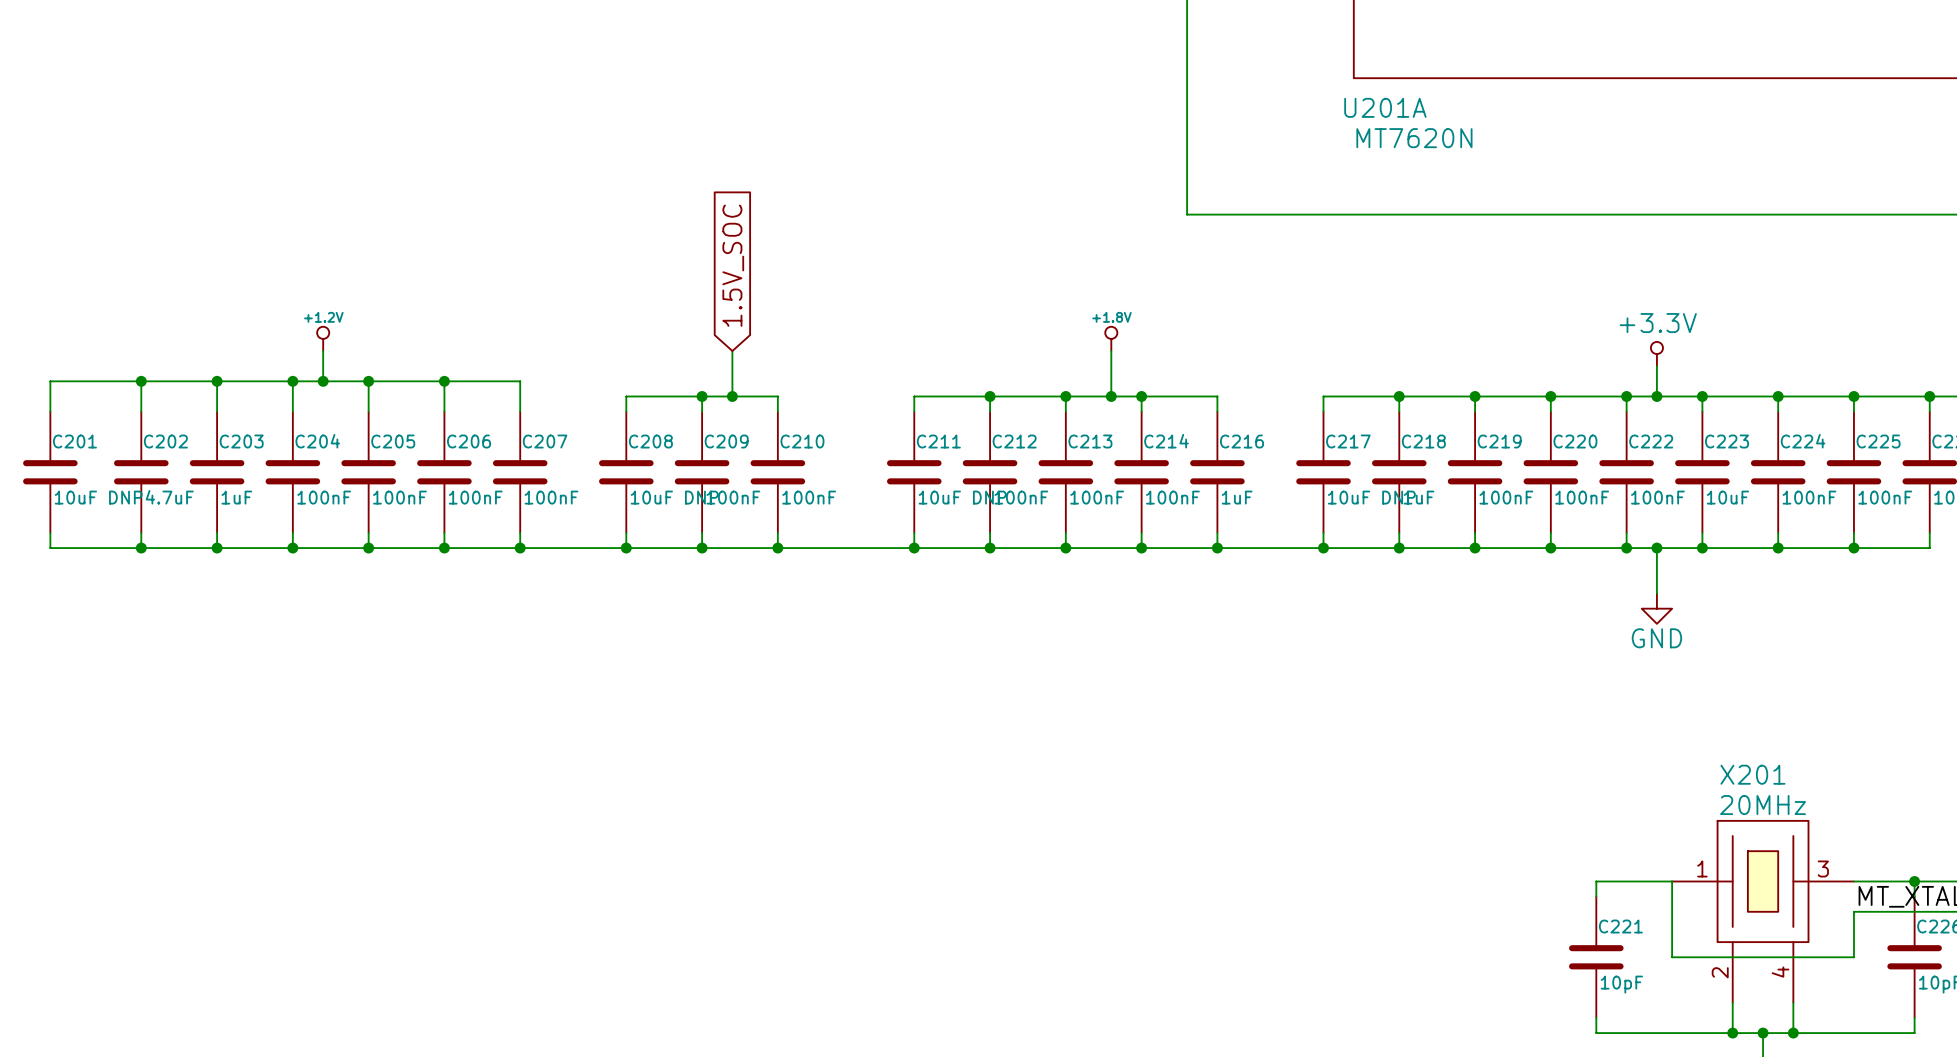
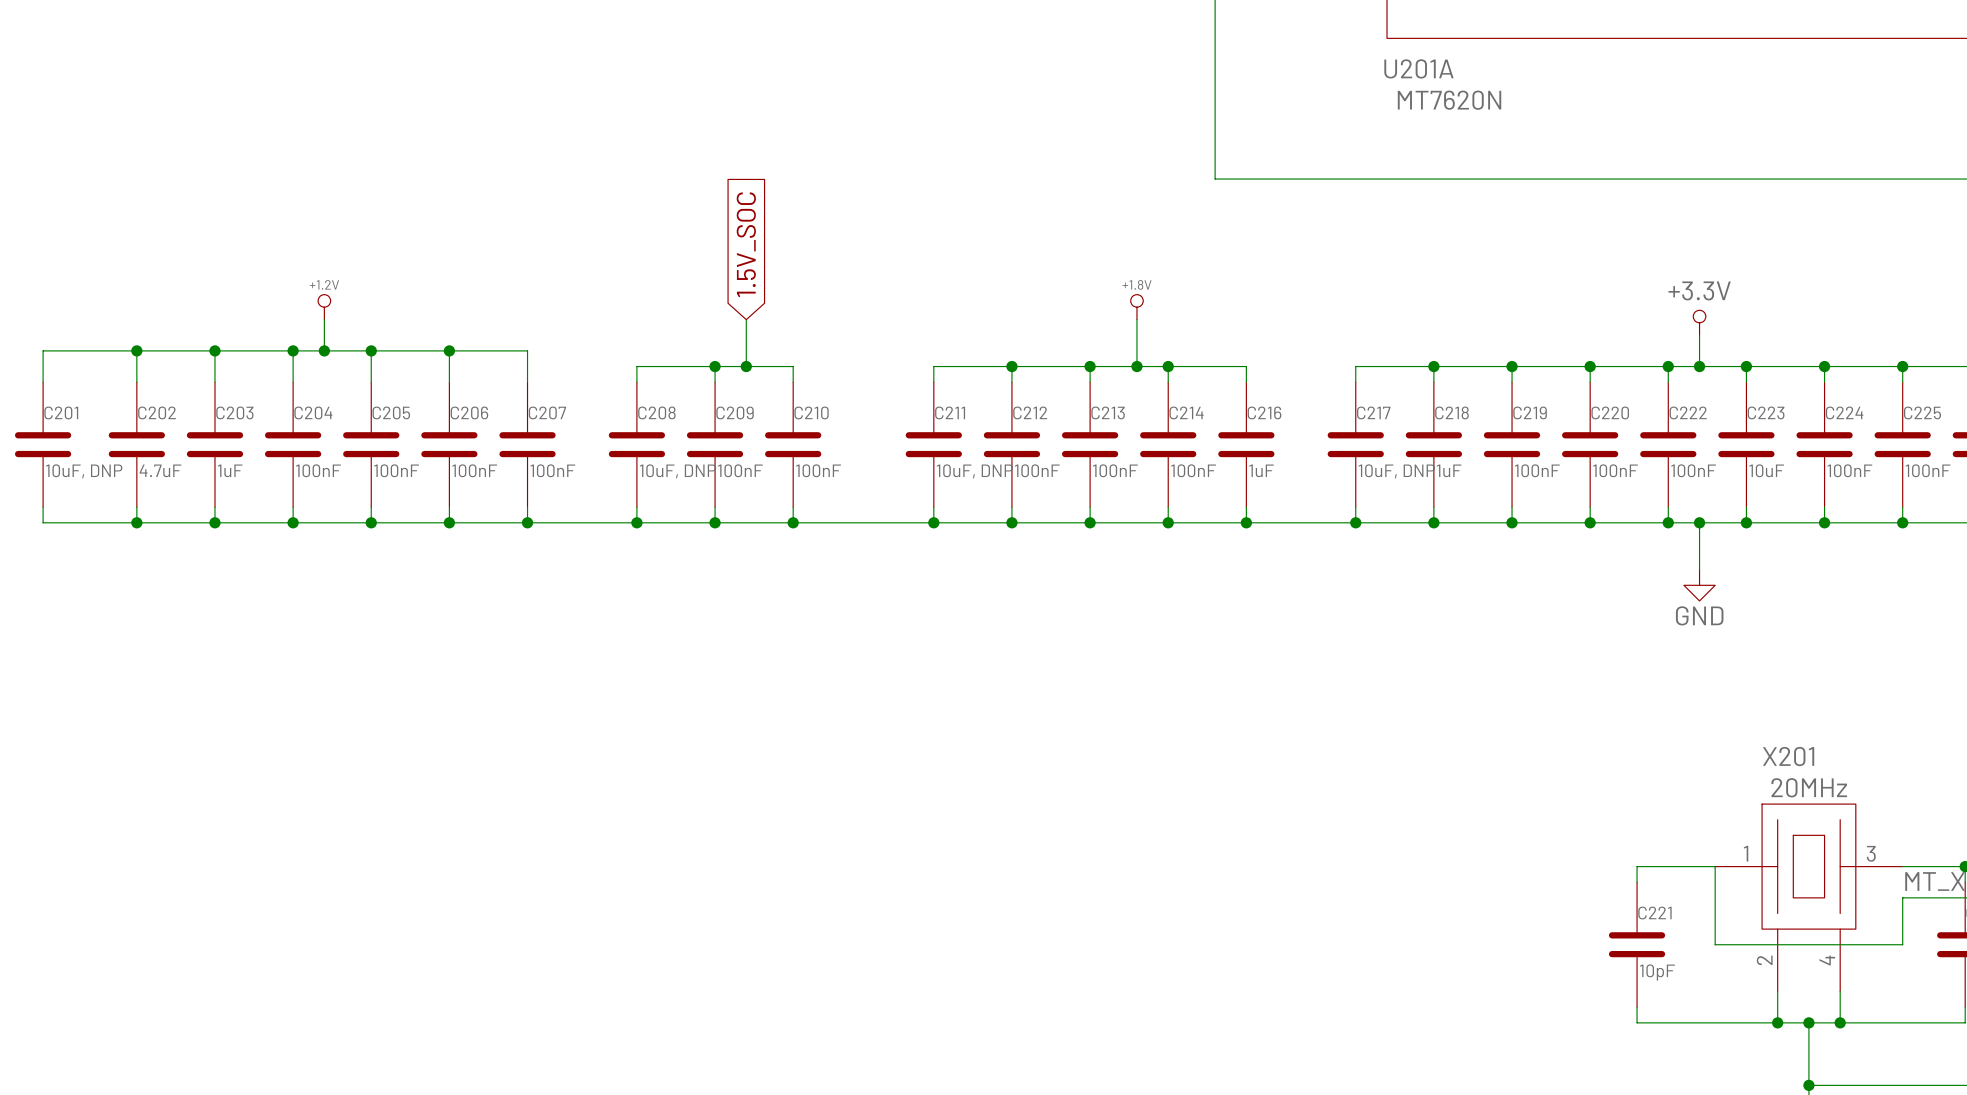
C201 value: 10uF DNP (98, 497) -> 10uF, DNP (84, 471)
C208 value: 10uF DNP (674, 497) -> 10uF, DNP (677, 471)
C211 value: 10uF DNP (962, 497) -> 10uF, DNP (974, 471)
C217 value: 10uF DNP (1371, 497) -> 10uF, DNP (1396, 471)

